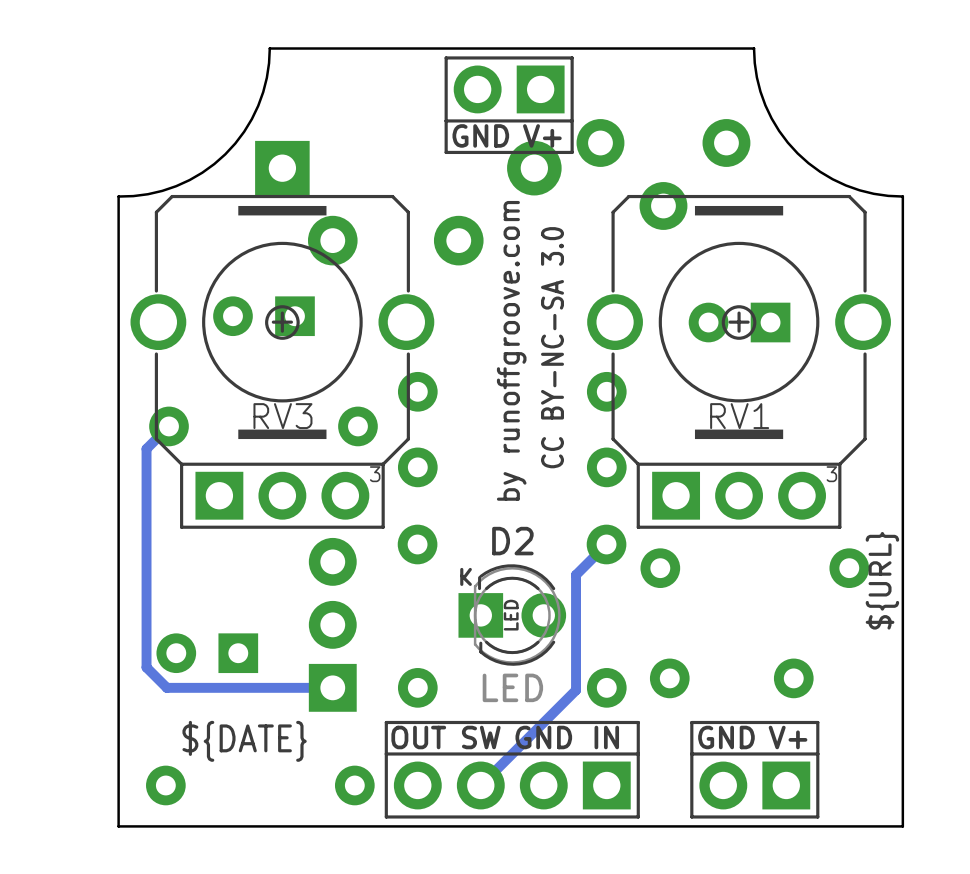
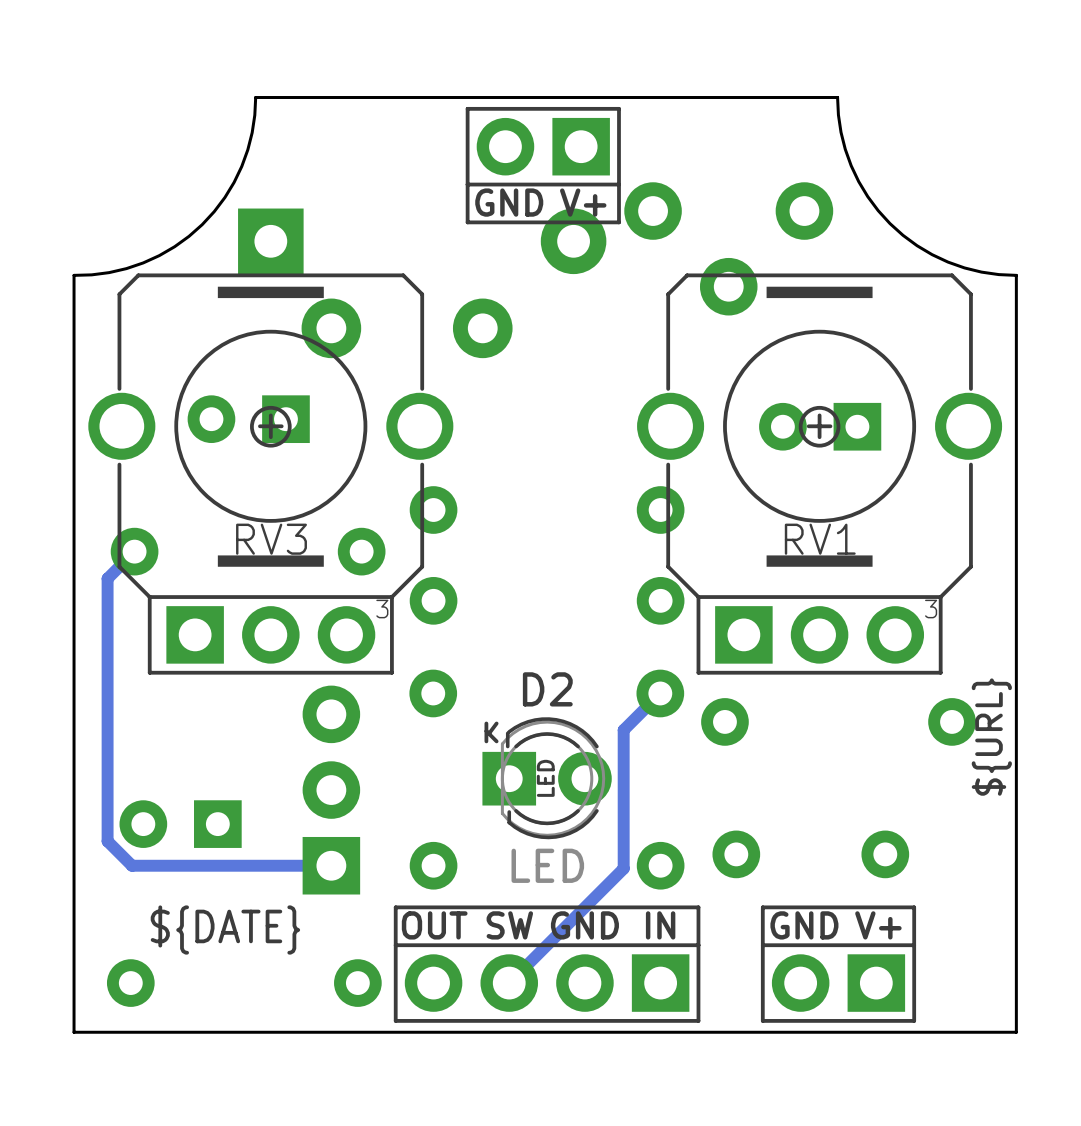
text: CC BY-NC-SA 3.0 (552, 347) -> none
text: by runoffgroove.com (511, 350) -> none

